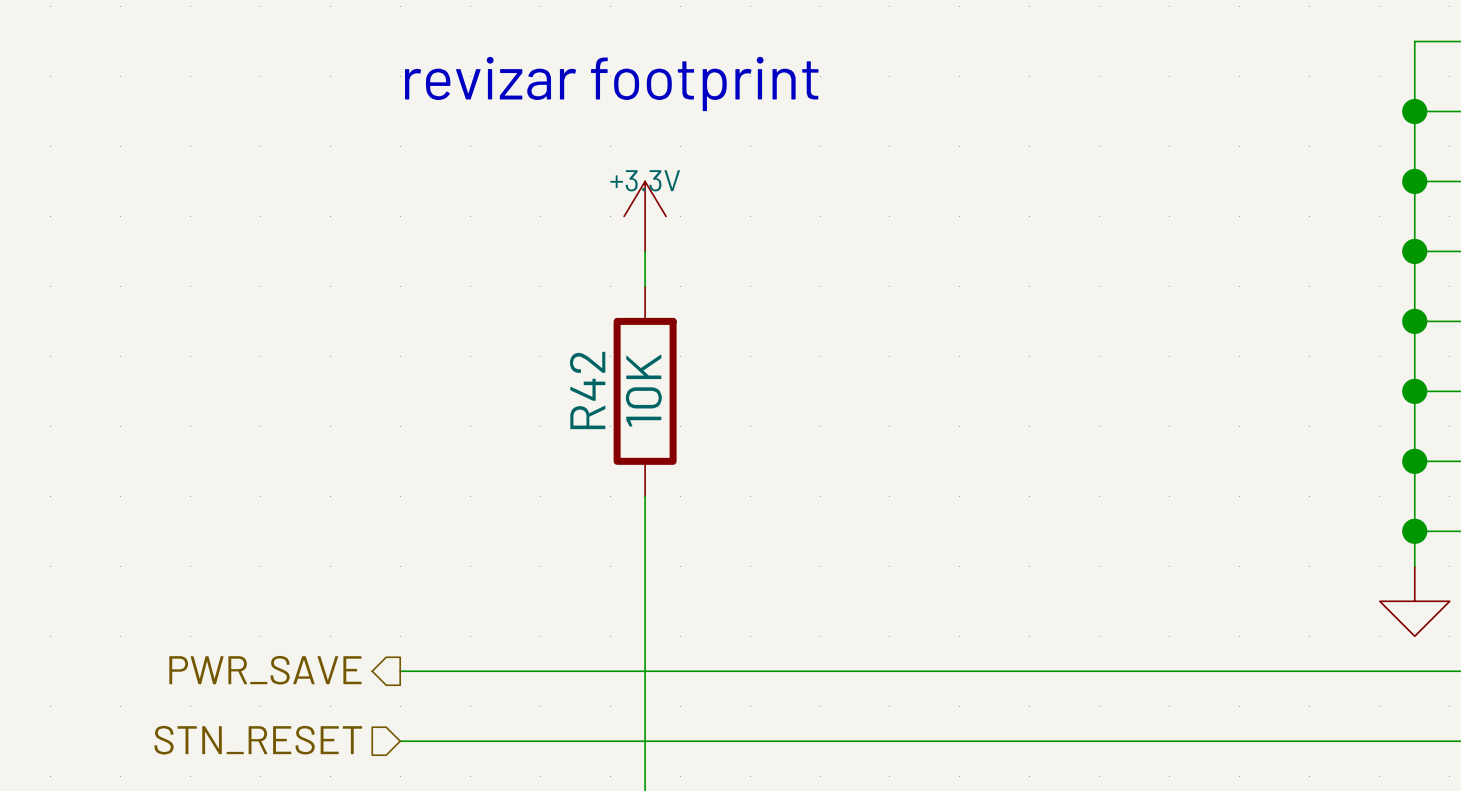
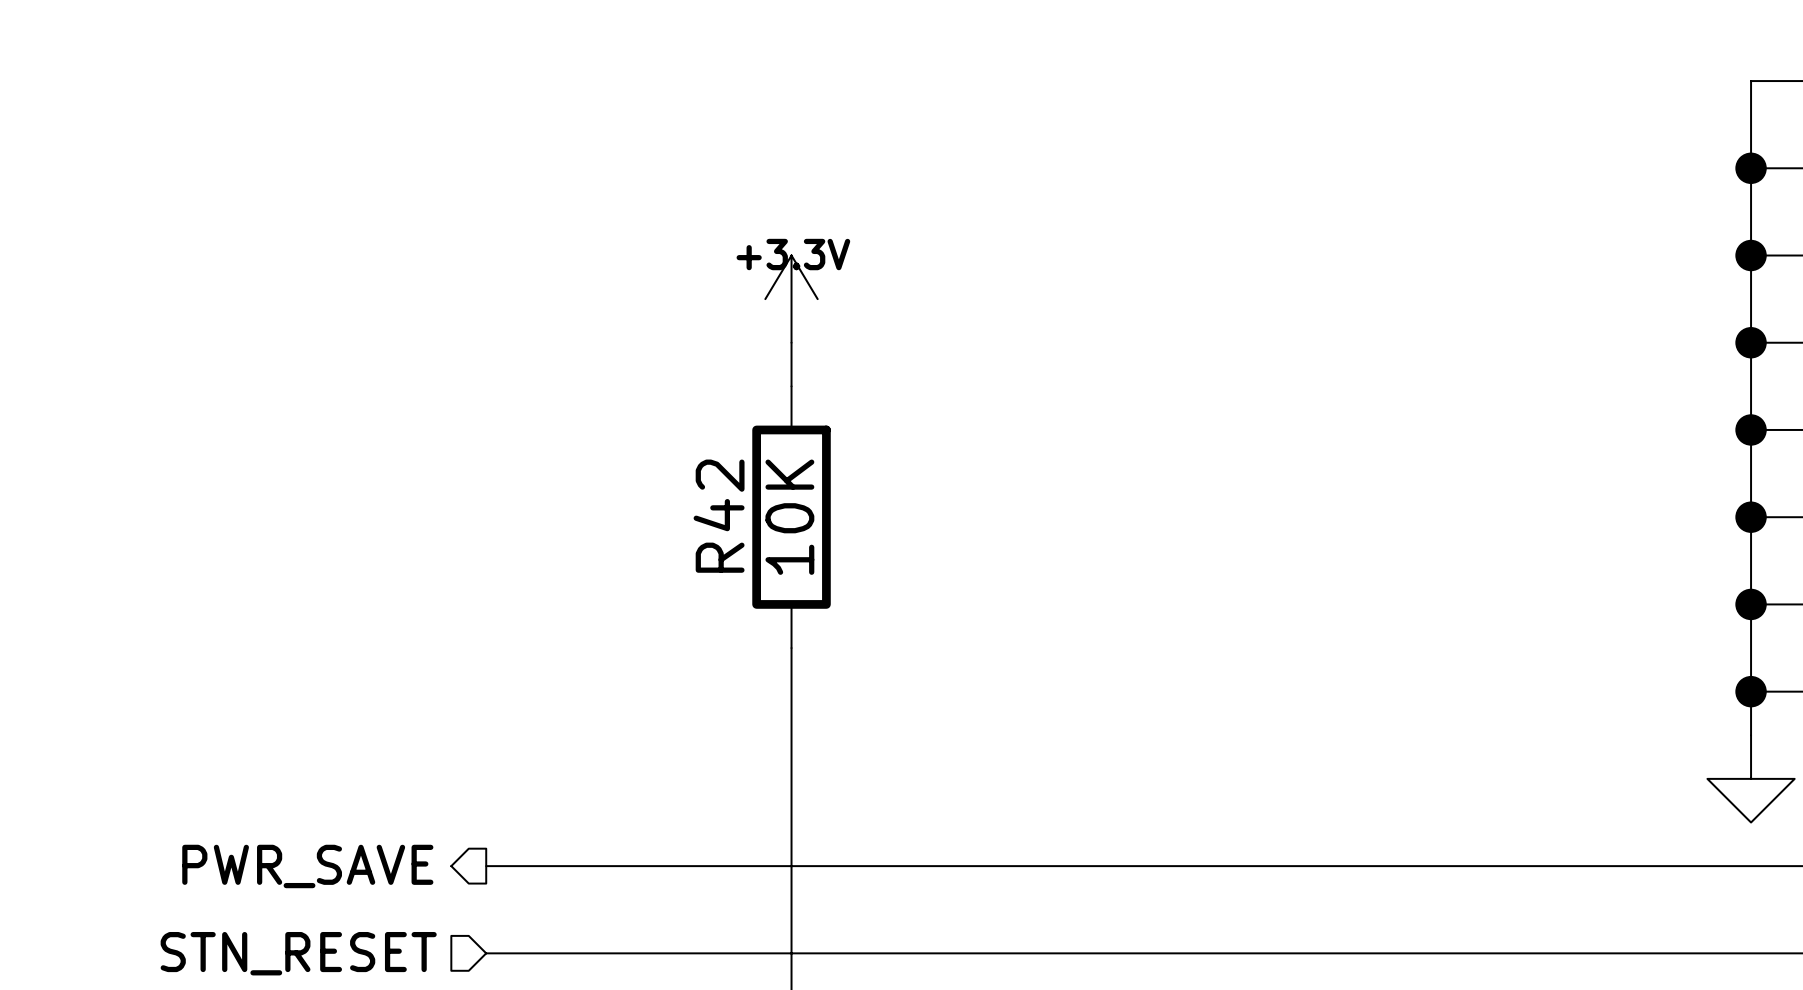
text: revizar footprint (611, 84) -> none

